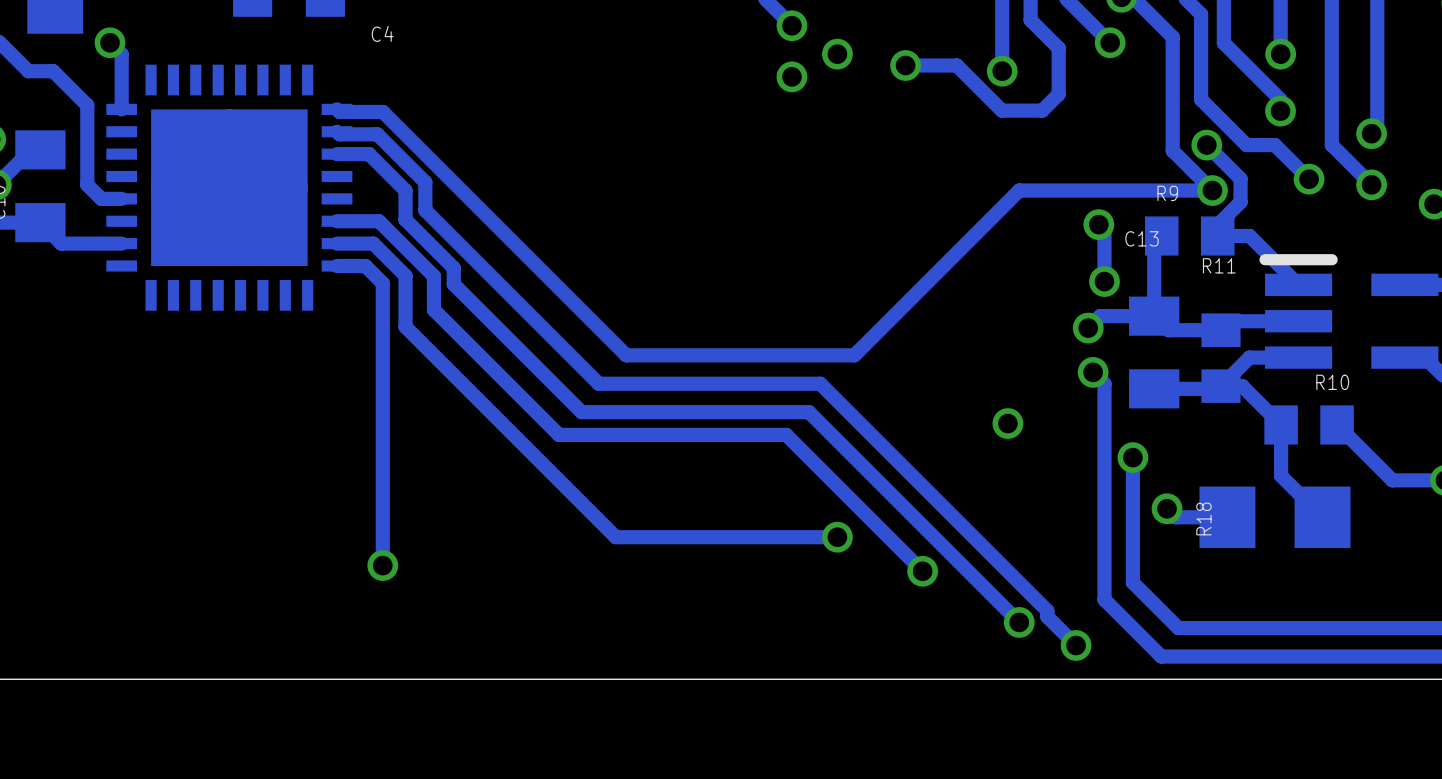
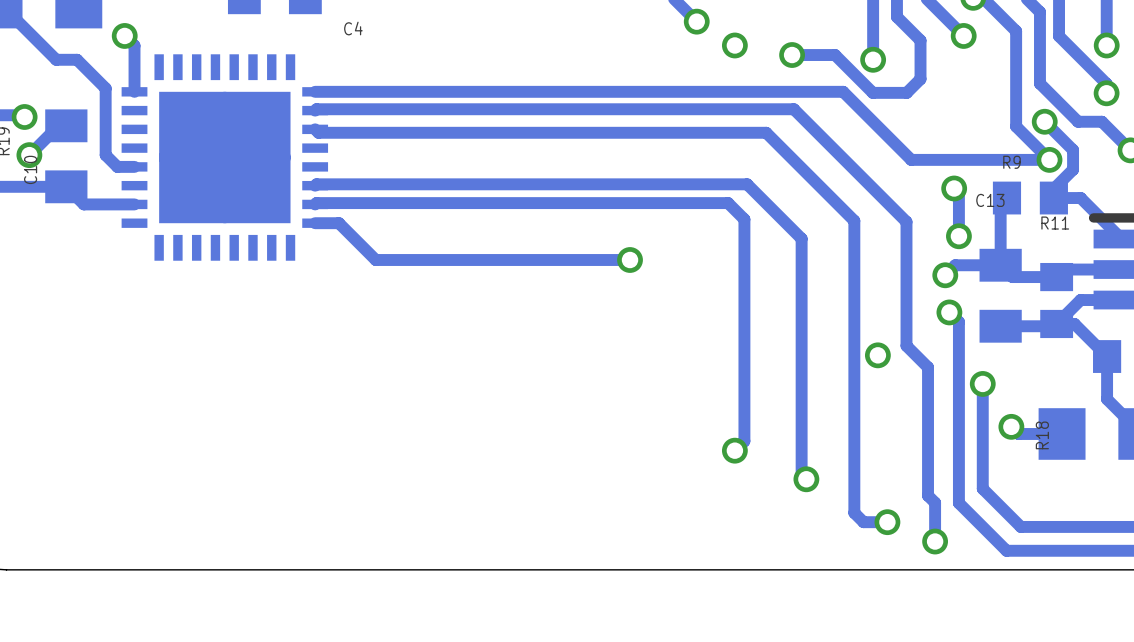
via: (791, 76) -> none
track: (337, 109) (339, 111) (382, 111) (626, 355) (854, 355) (1019, 190) (1047, 190) -> (315, 91) (843, 91) (911, 159)
track: (337, 131) (339, 134) (377, 134) (425, 182) (425, 210) (598, 383) (820, 383) (1047, 610) (1047, 616) (1076, 645) -> (315, 110) (793, 109) (906, 221) (906, 345) (928, 367) (928, 495) (935, 502) (935, 541)
track: (337, 154) (369, 154) (405, 190) (405, 219) (453, 267) (453, 284) (581, 412) (809, 412) (1019, 622) -> (315, 129) (318, 132) (766, 132) (854, 220) (854, 512) (863, 522) (887, 522)
track: (337, 221) (379, 221) (433, 276) (433, 309) (558, 434) (786, 434) (916, 565) -> (315, 185) (747, 184) (801, 238) (801, 474)
track: (337, 243) (373, 243) (405, 275) (405, 326) (615, 537) (837, 537) -> (315, 204) (728, 203) (744, 219) (744, 441) (734, 450)
track: (382, 283) (382, 565) -> (353, 237) (375, 260) (630, 260)
via: none -> (630, 260)
via: (382, 565) -> none

